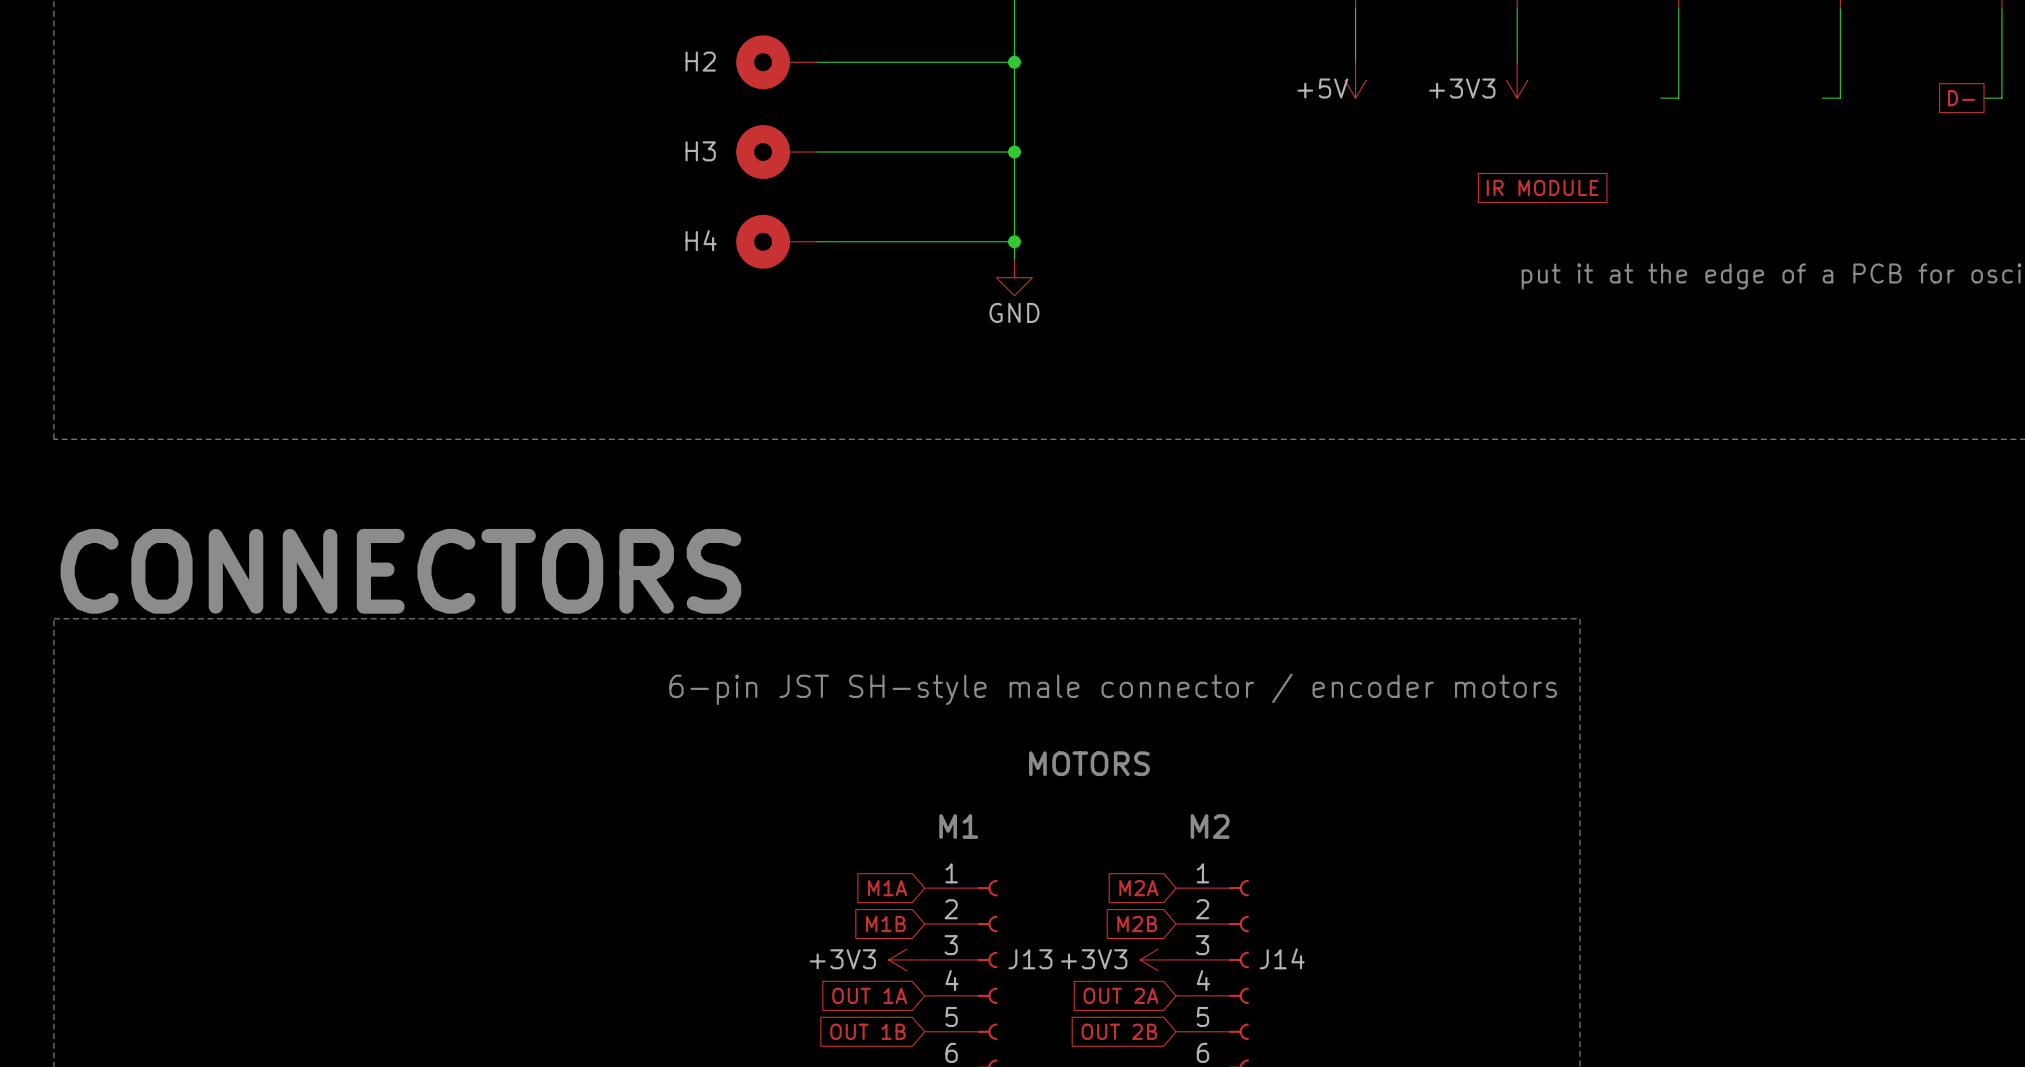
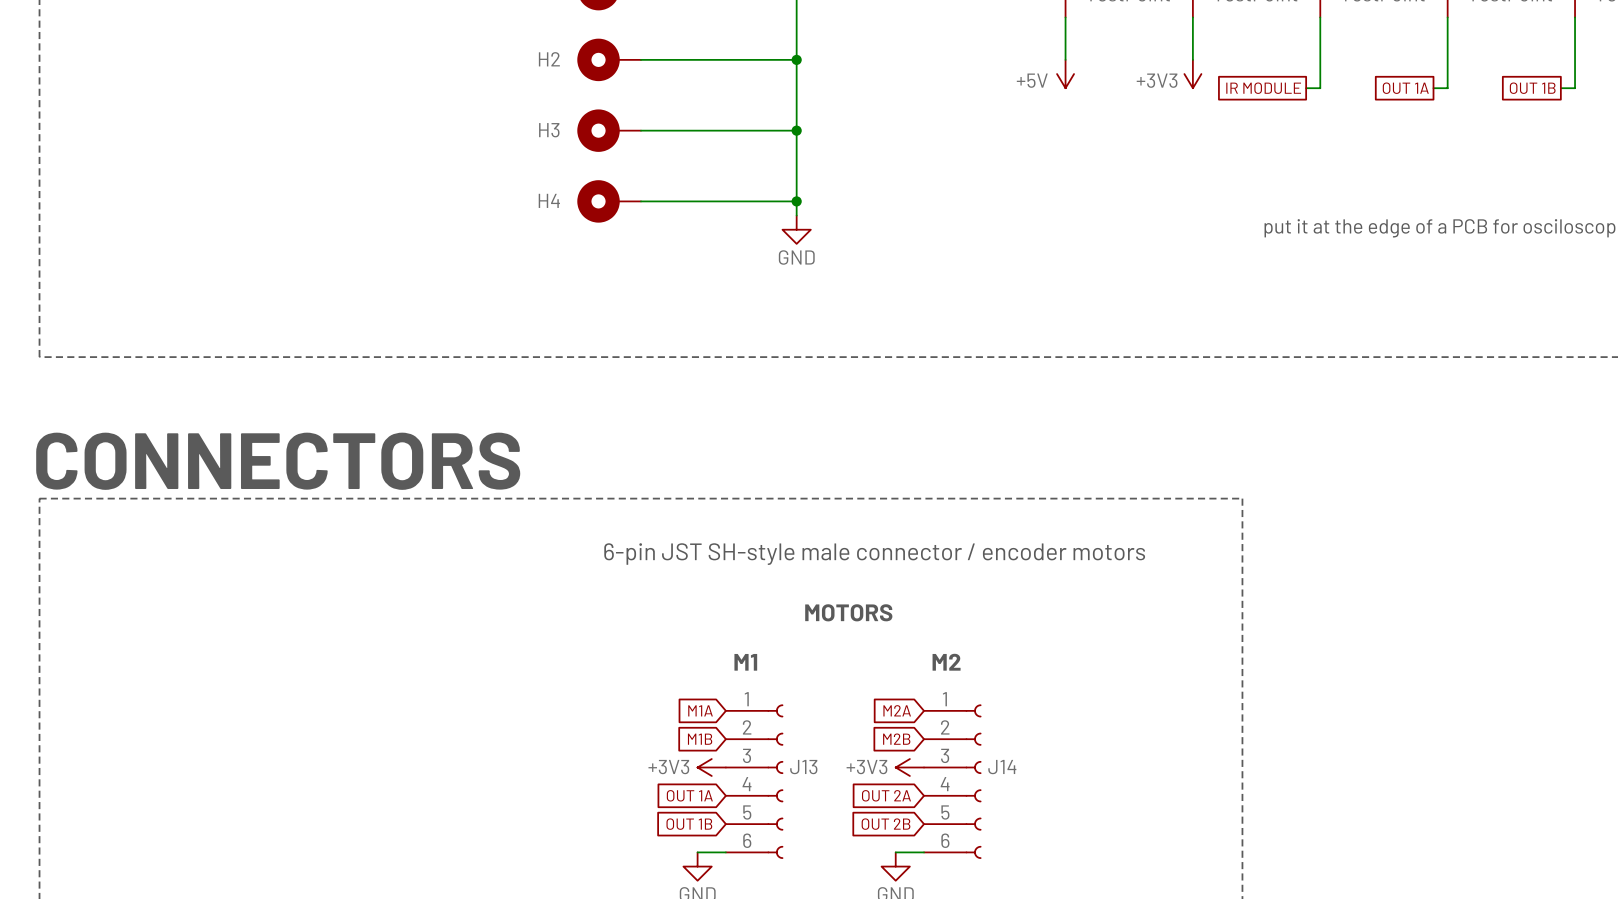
global label: none -> OUT 1A (1405, 88)
global label: D- (1961, 98) -> OUT 1B (1532, 88)
global label position: IR MODULE (1542, 187) -> IR MODULE (1263, 88)

